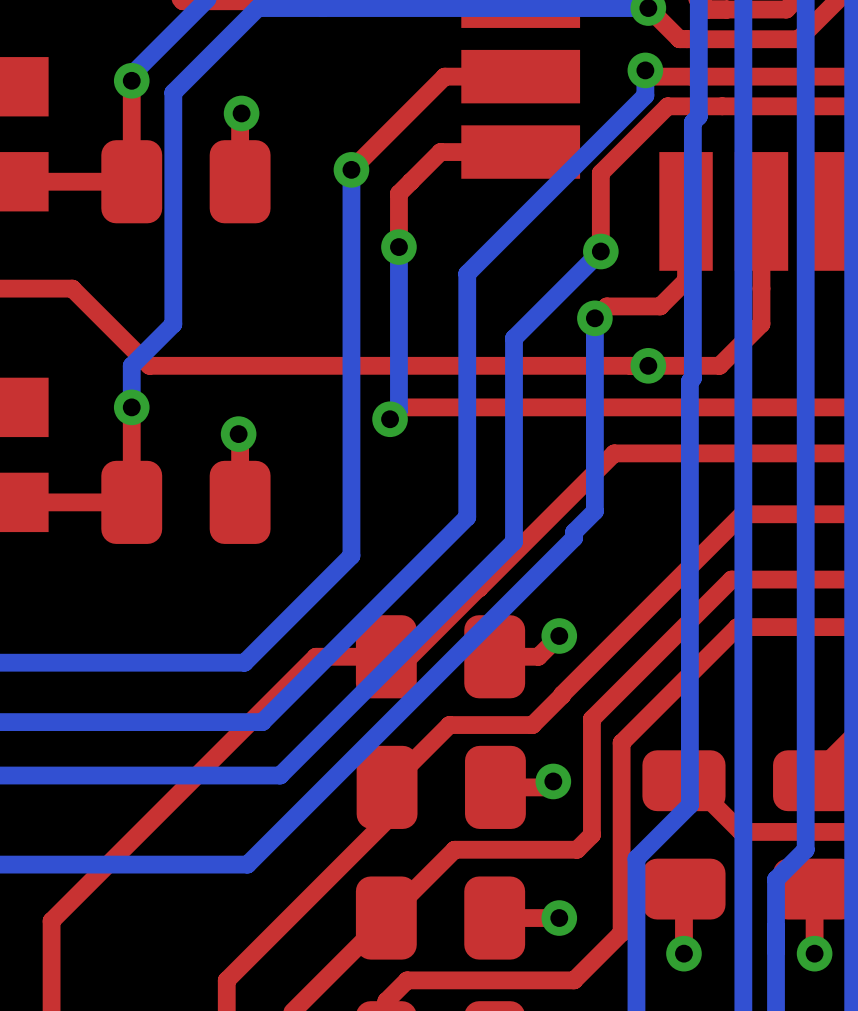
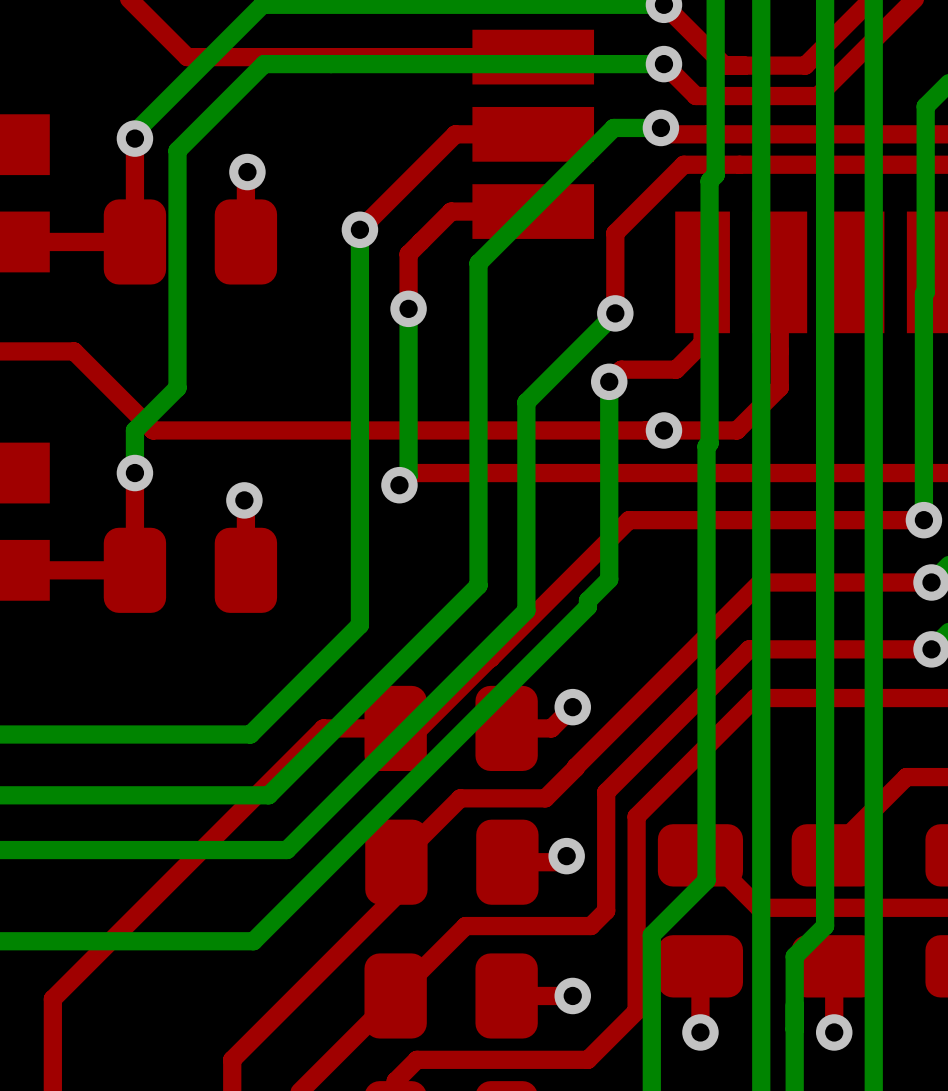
bottom track: (645, 70) (645, 95) (467, 273) -> (660, 127) (613, 127) (478, 263) (478, 336)

